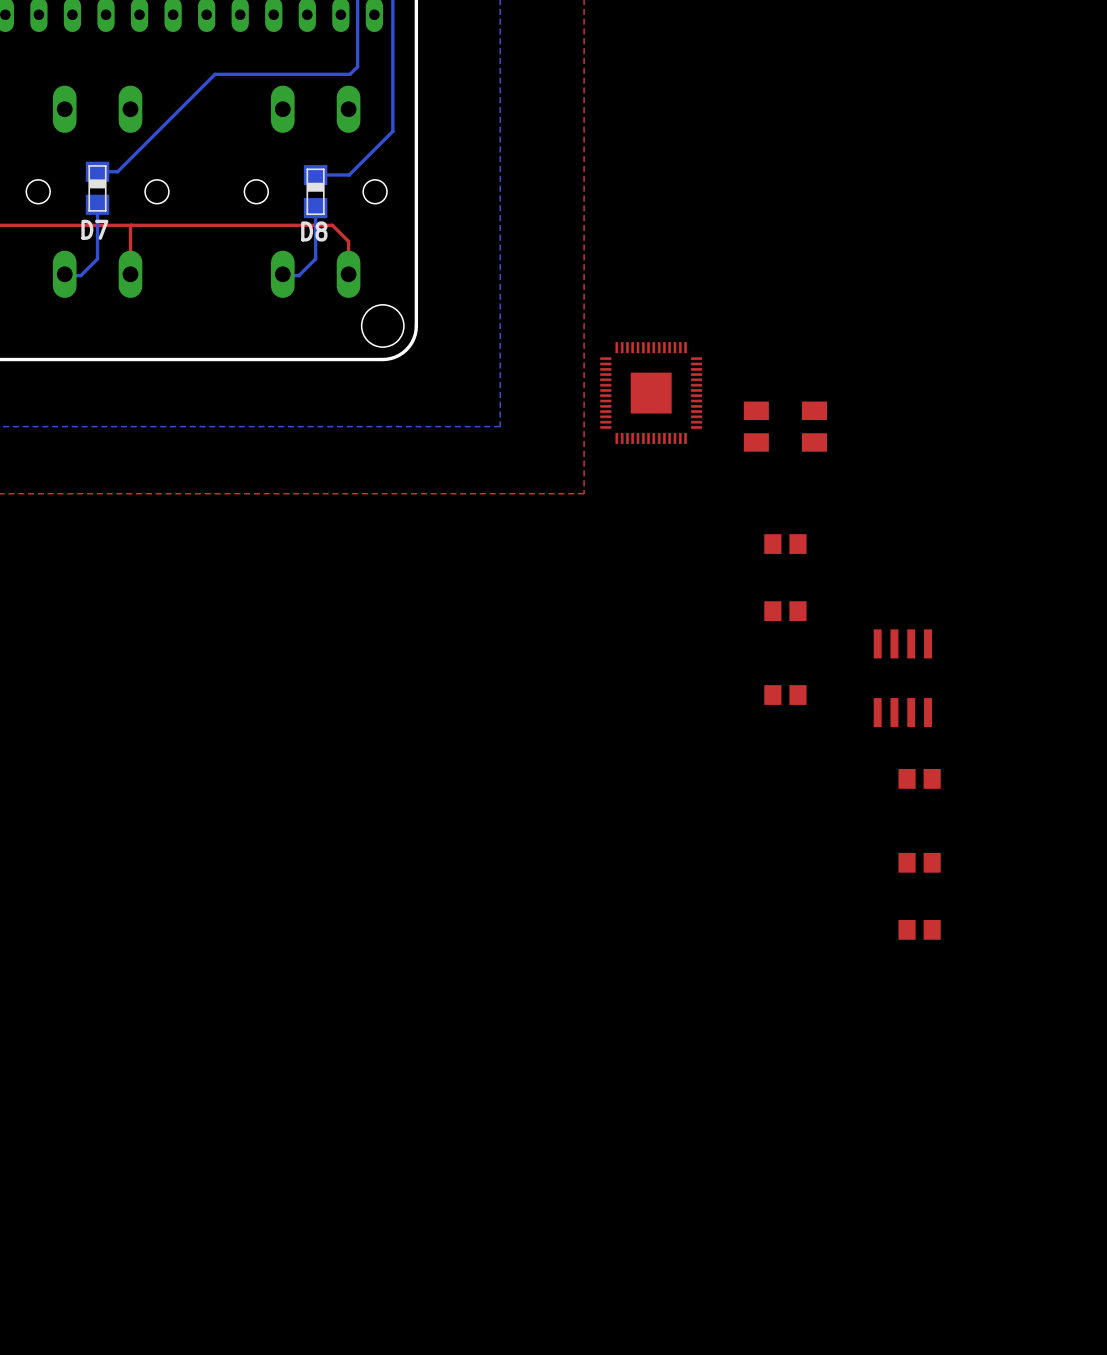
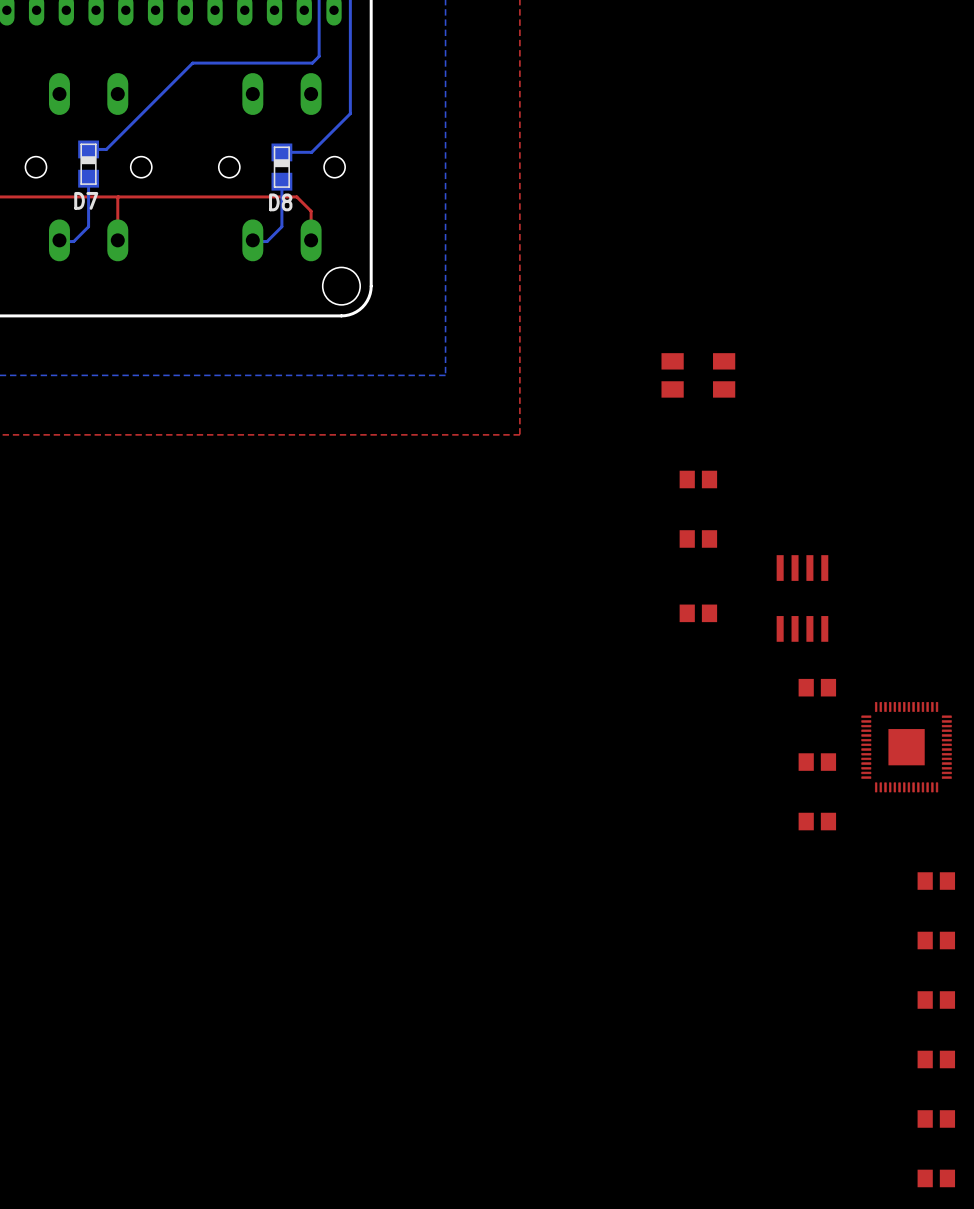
part: (651, 393) -> none
part: none -> (906, 747)
part: none -> (936, 881)
part: none -> (936, 940)
part: none -> (936, 999)
part: none -> (936, 1059)
part: none -> (936, 1118)
part: none -> (936, 1178)

